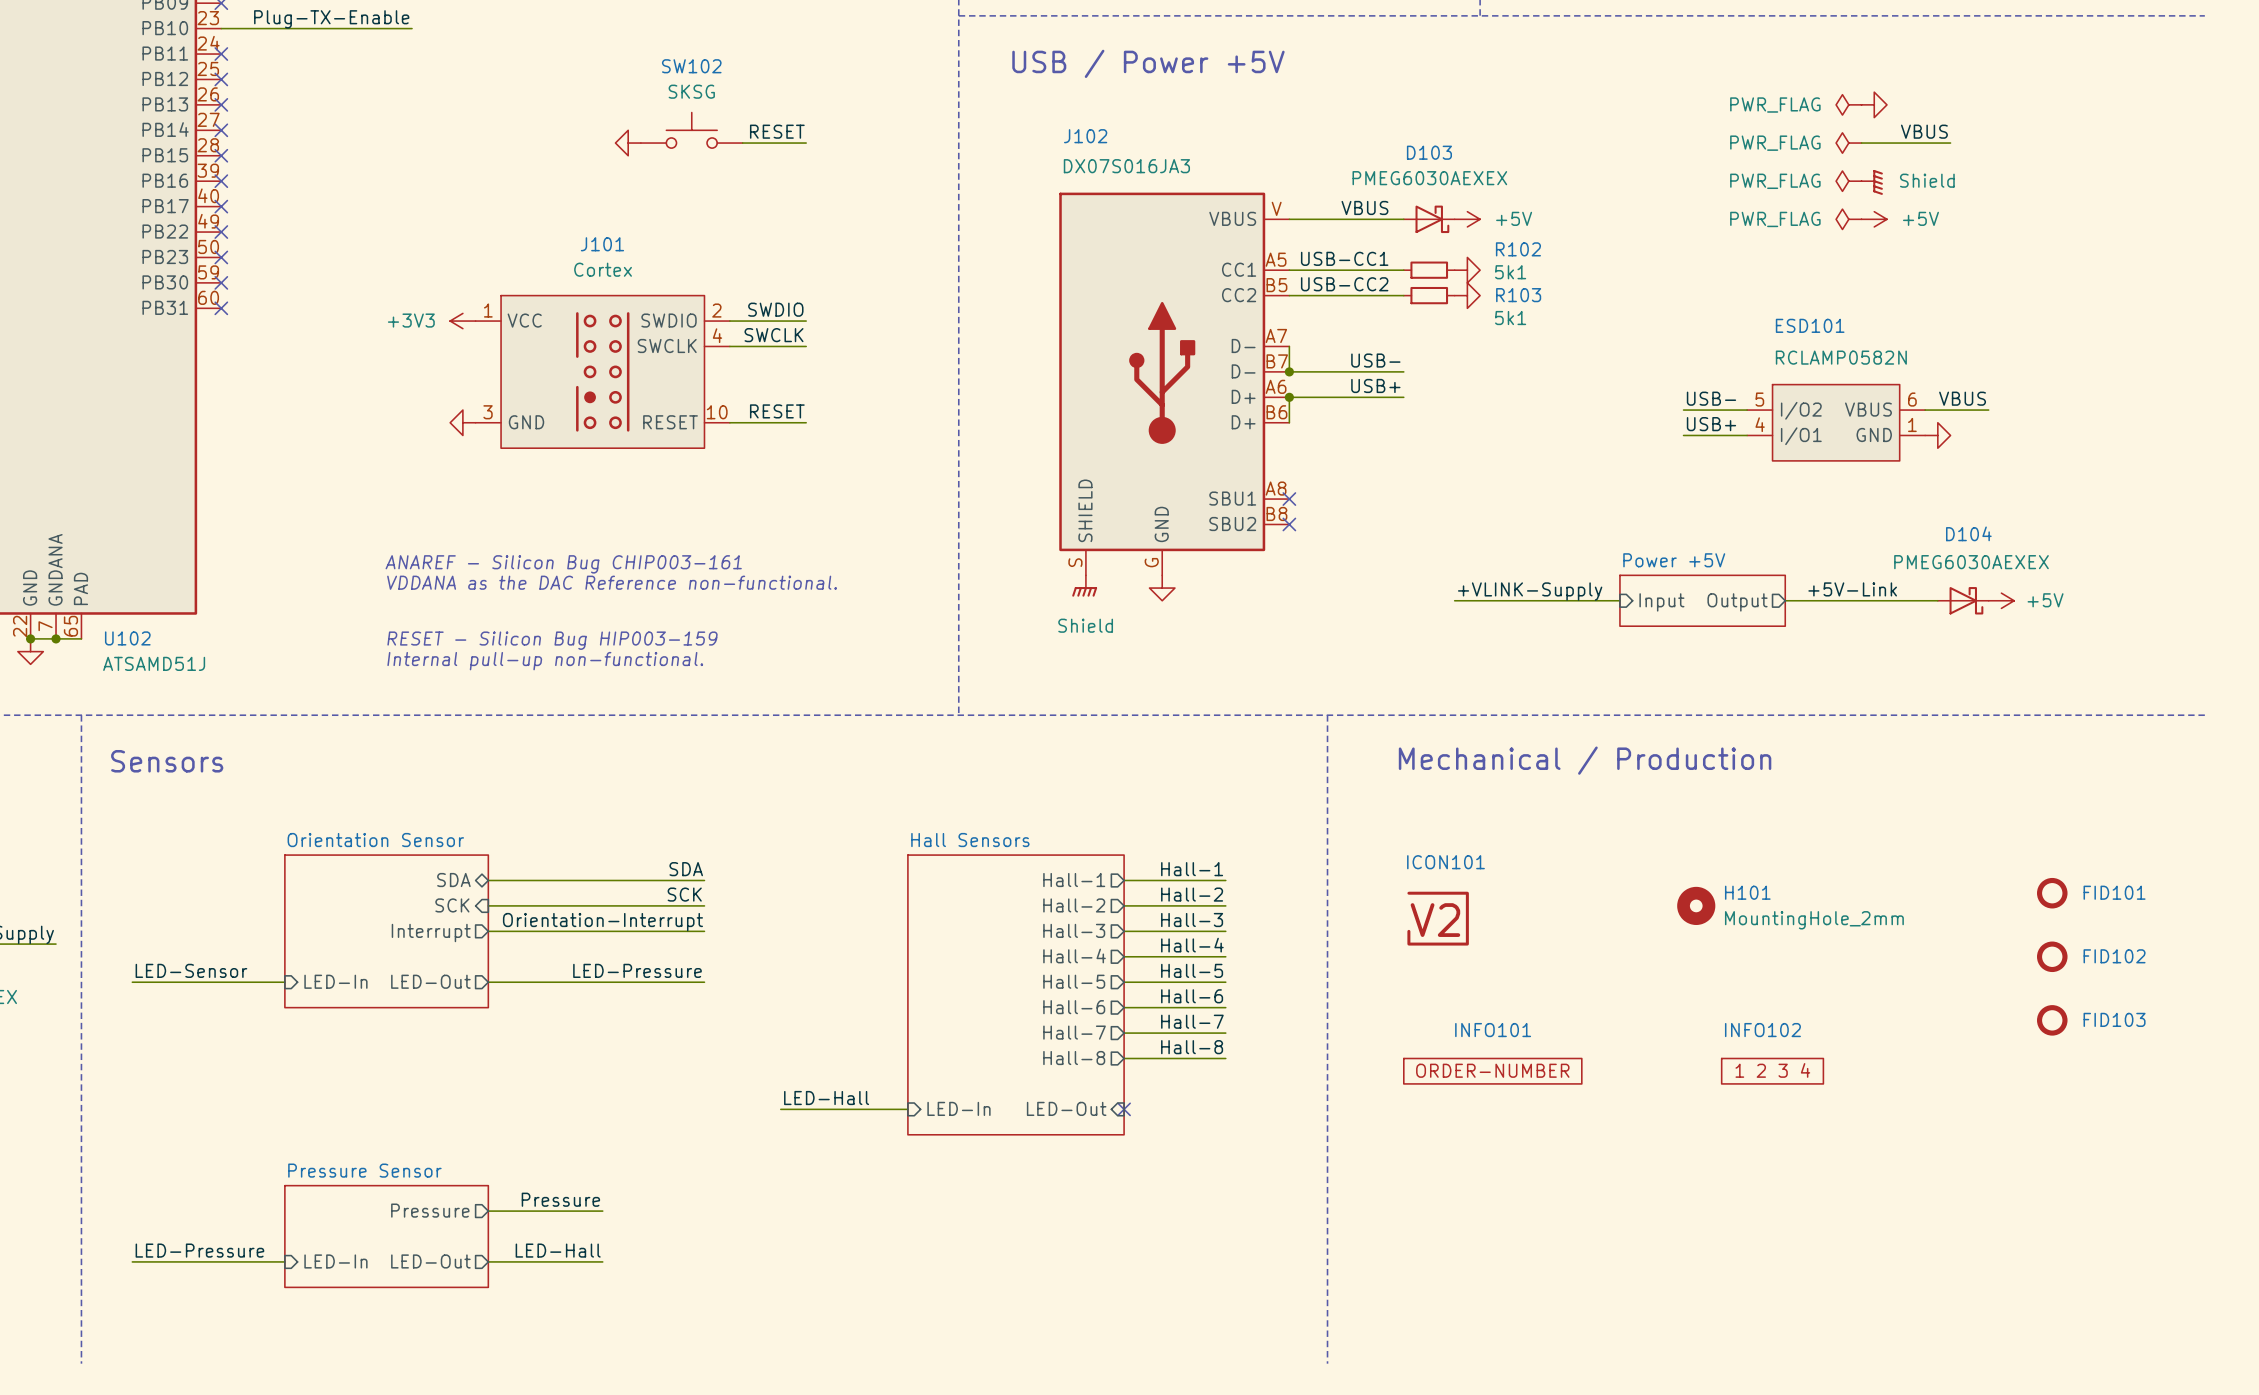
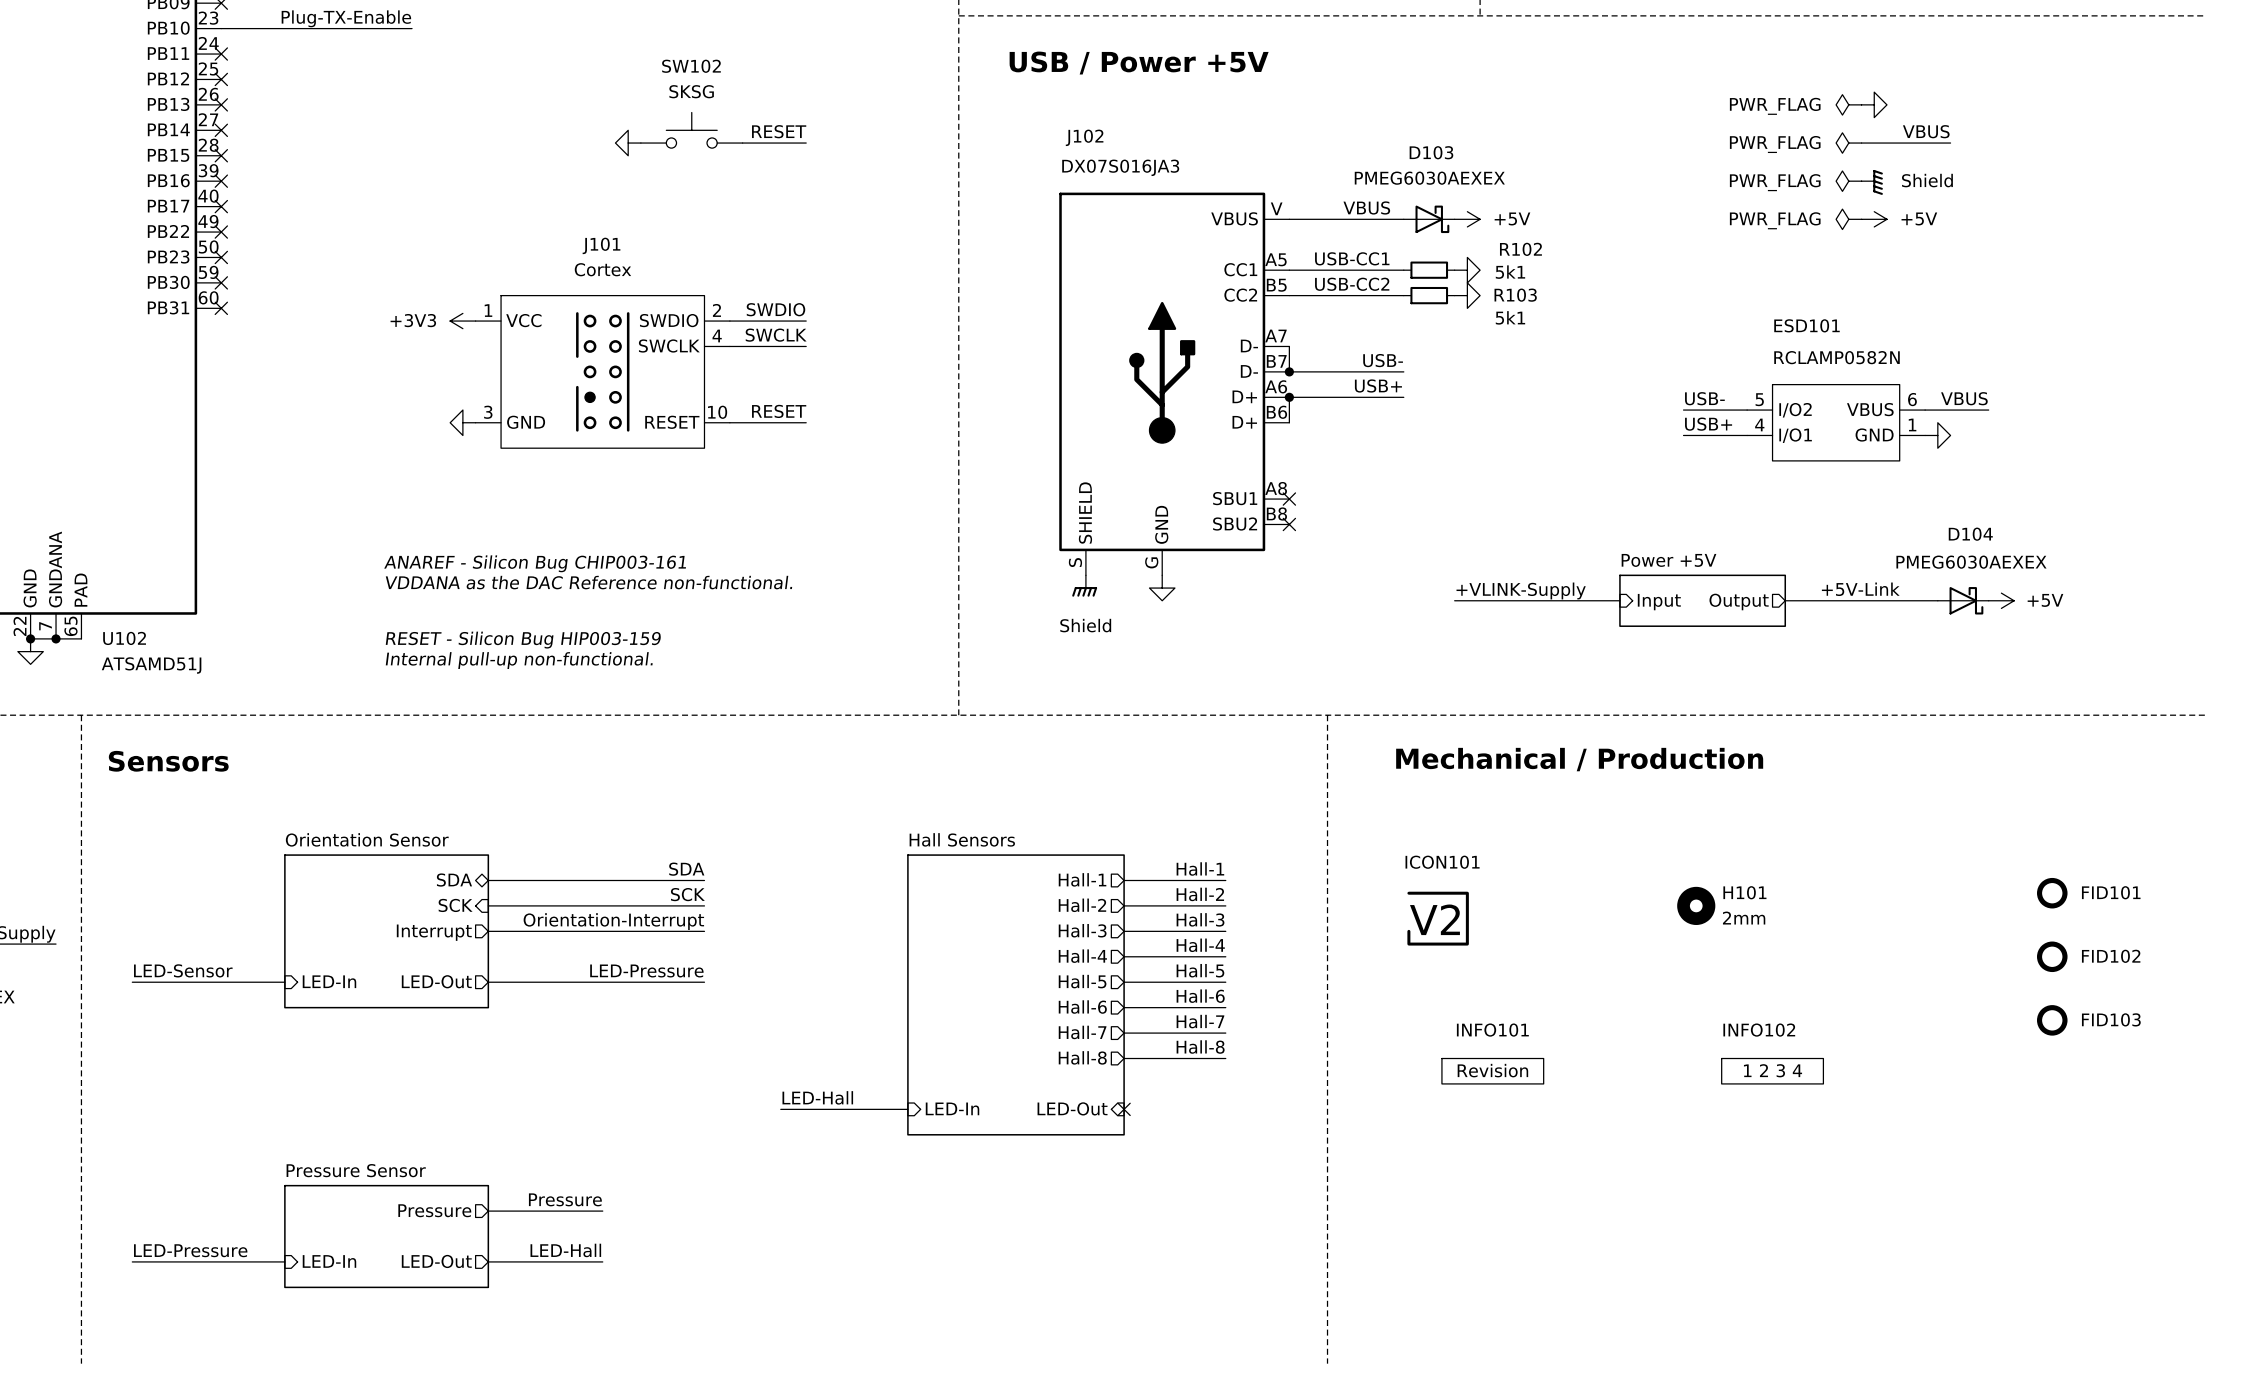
H101 value: MountingHole_2mm (1814, 920) -> 2mm (1744, 918)
INFO101 symbol: [1403, 1058, 1582, 1084] -> [1441, 1058, 1544, 1084]

